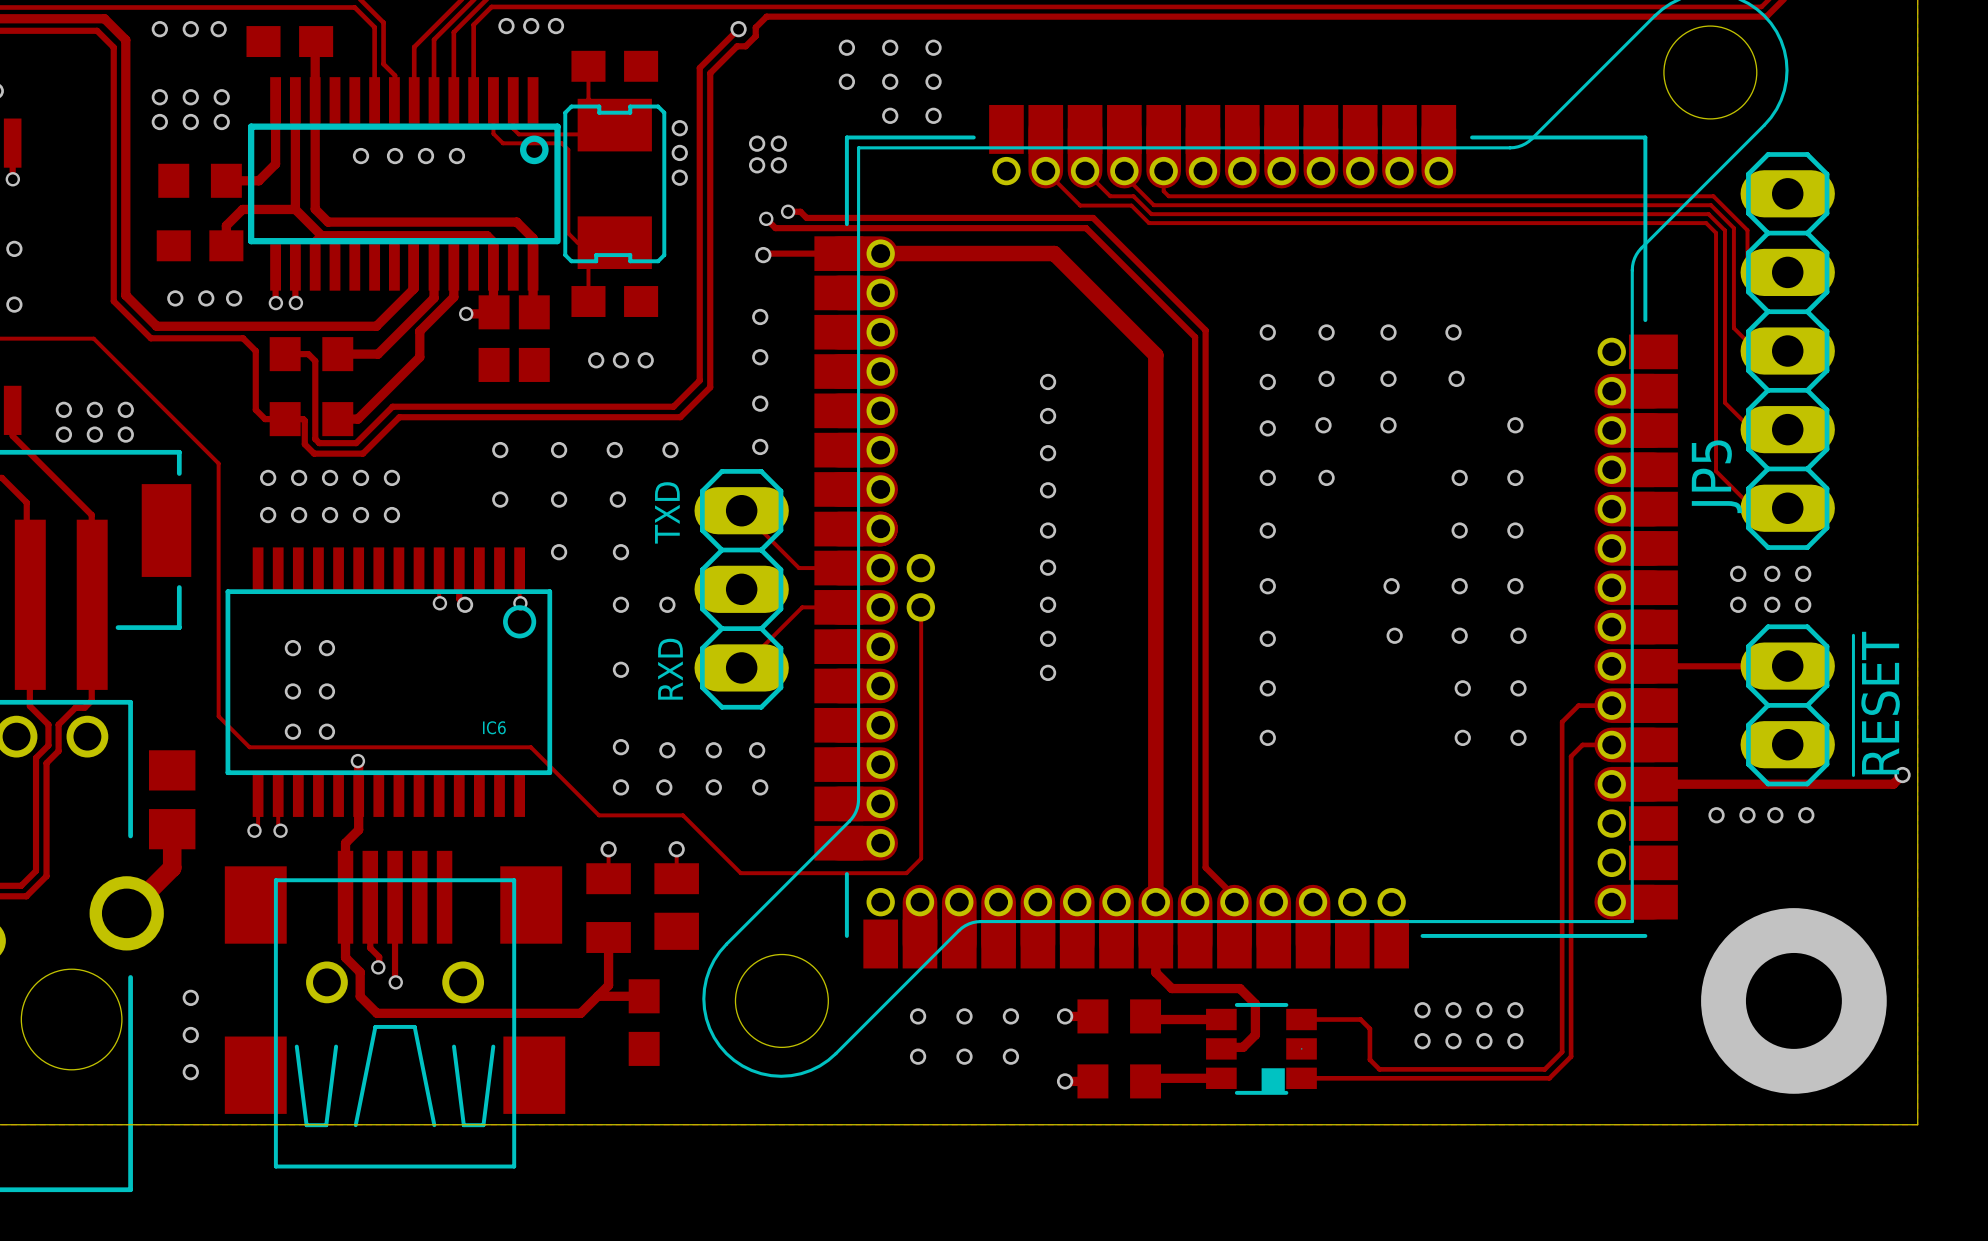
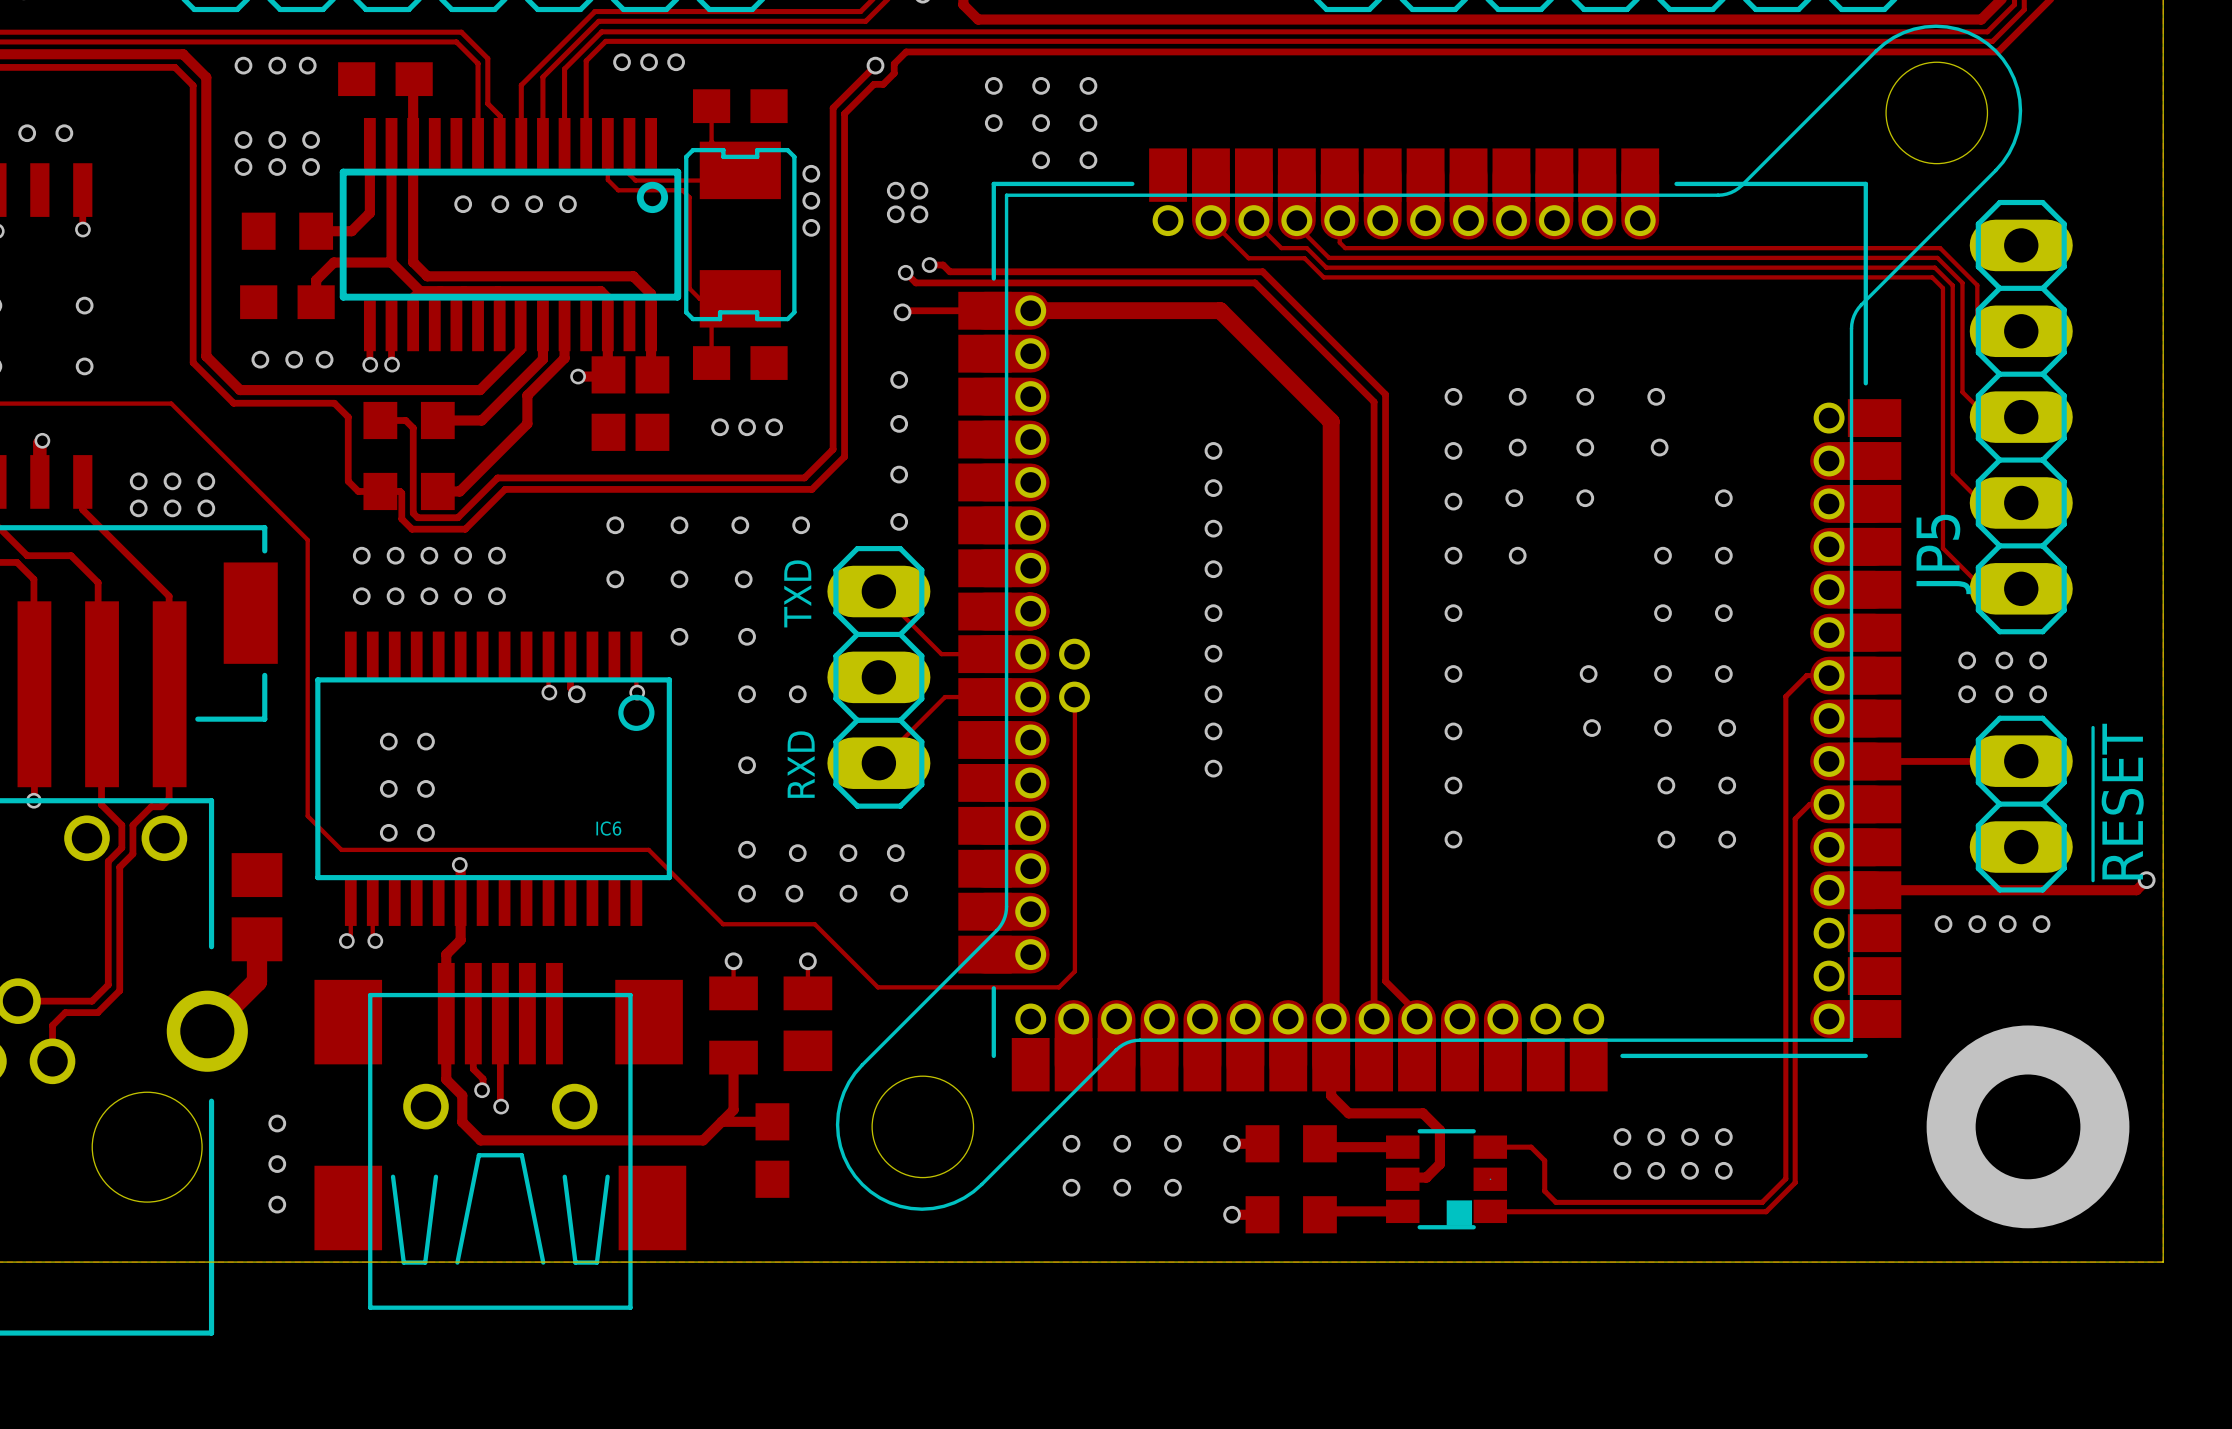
track: (1594, 705) (1578, 705) (1562, 722) (1562, 1052) (1544, 1069) (1379, 1069) (1369, 1059) (1369, 1028) (1360, 1019) (1338, 1019) -> (1829, 675) (1806, 675) (1785, 696) (1785, 1178) (1762, 1202) (1556, 1202) (1544, 1191) (1544, 1160) (1531, 1147)
track: (1611, 744) (1582, 744) (1571, 756) (1571, 1056) (1549, 1078) (1301, 1078) -> (1809, 804) (1795, 818) (1795, 1182) (1766, 1211) (1490, 1211)

